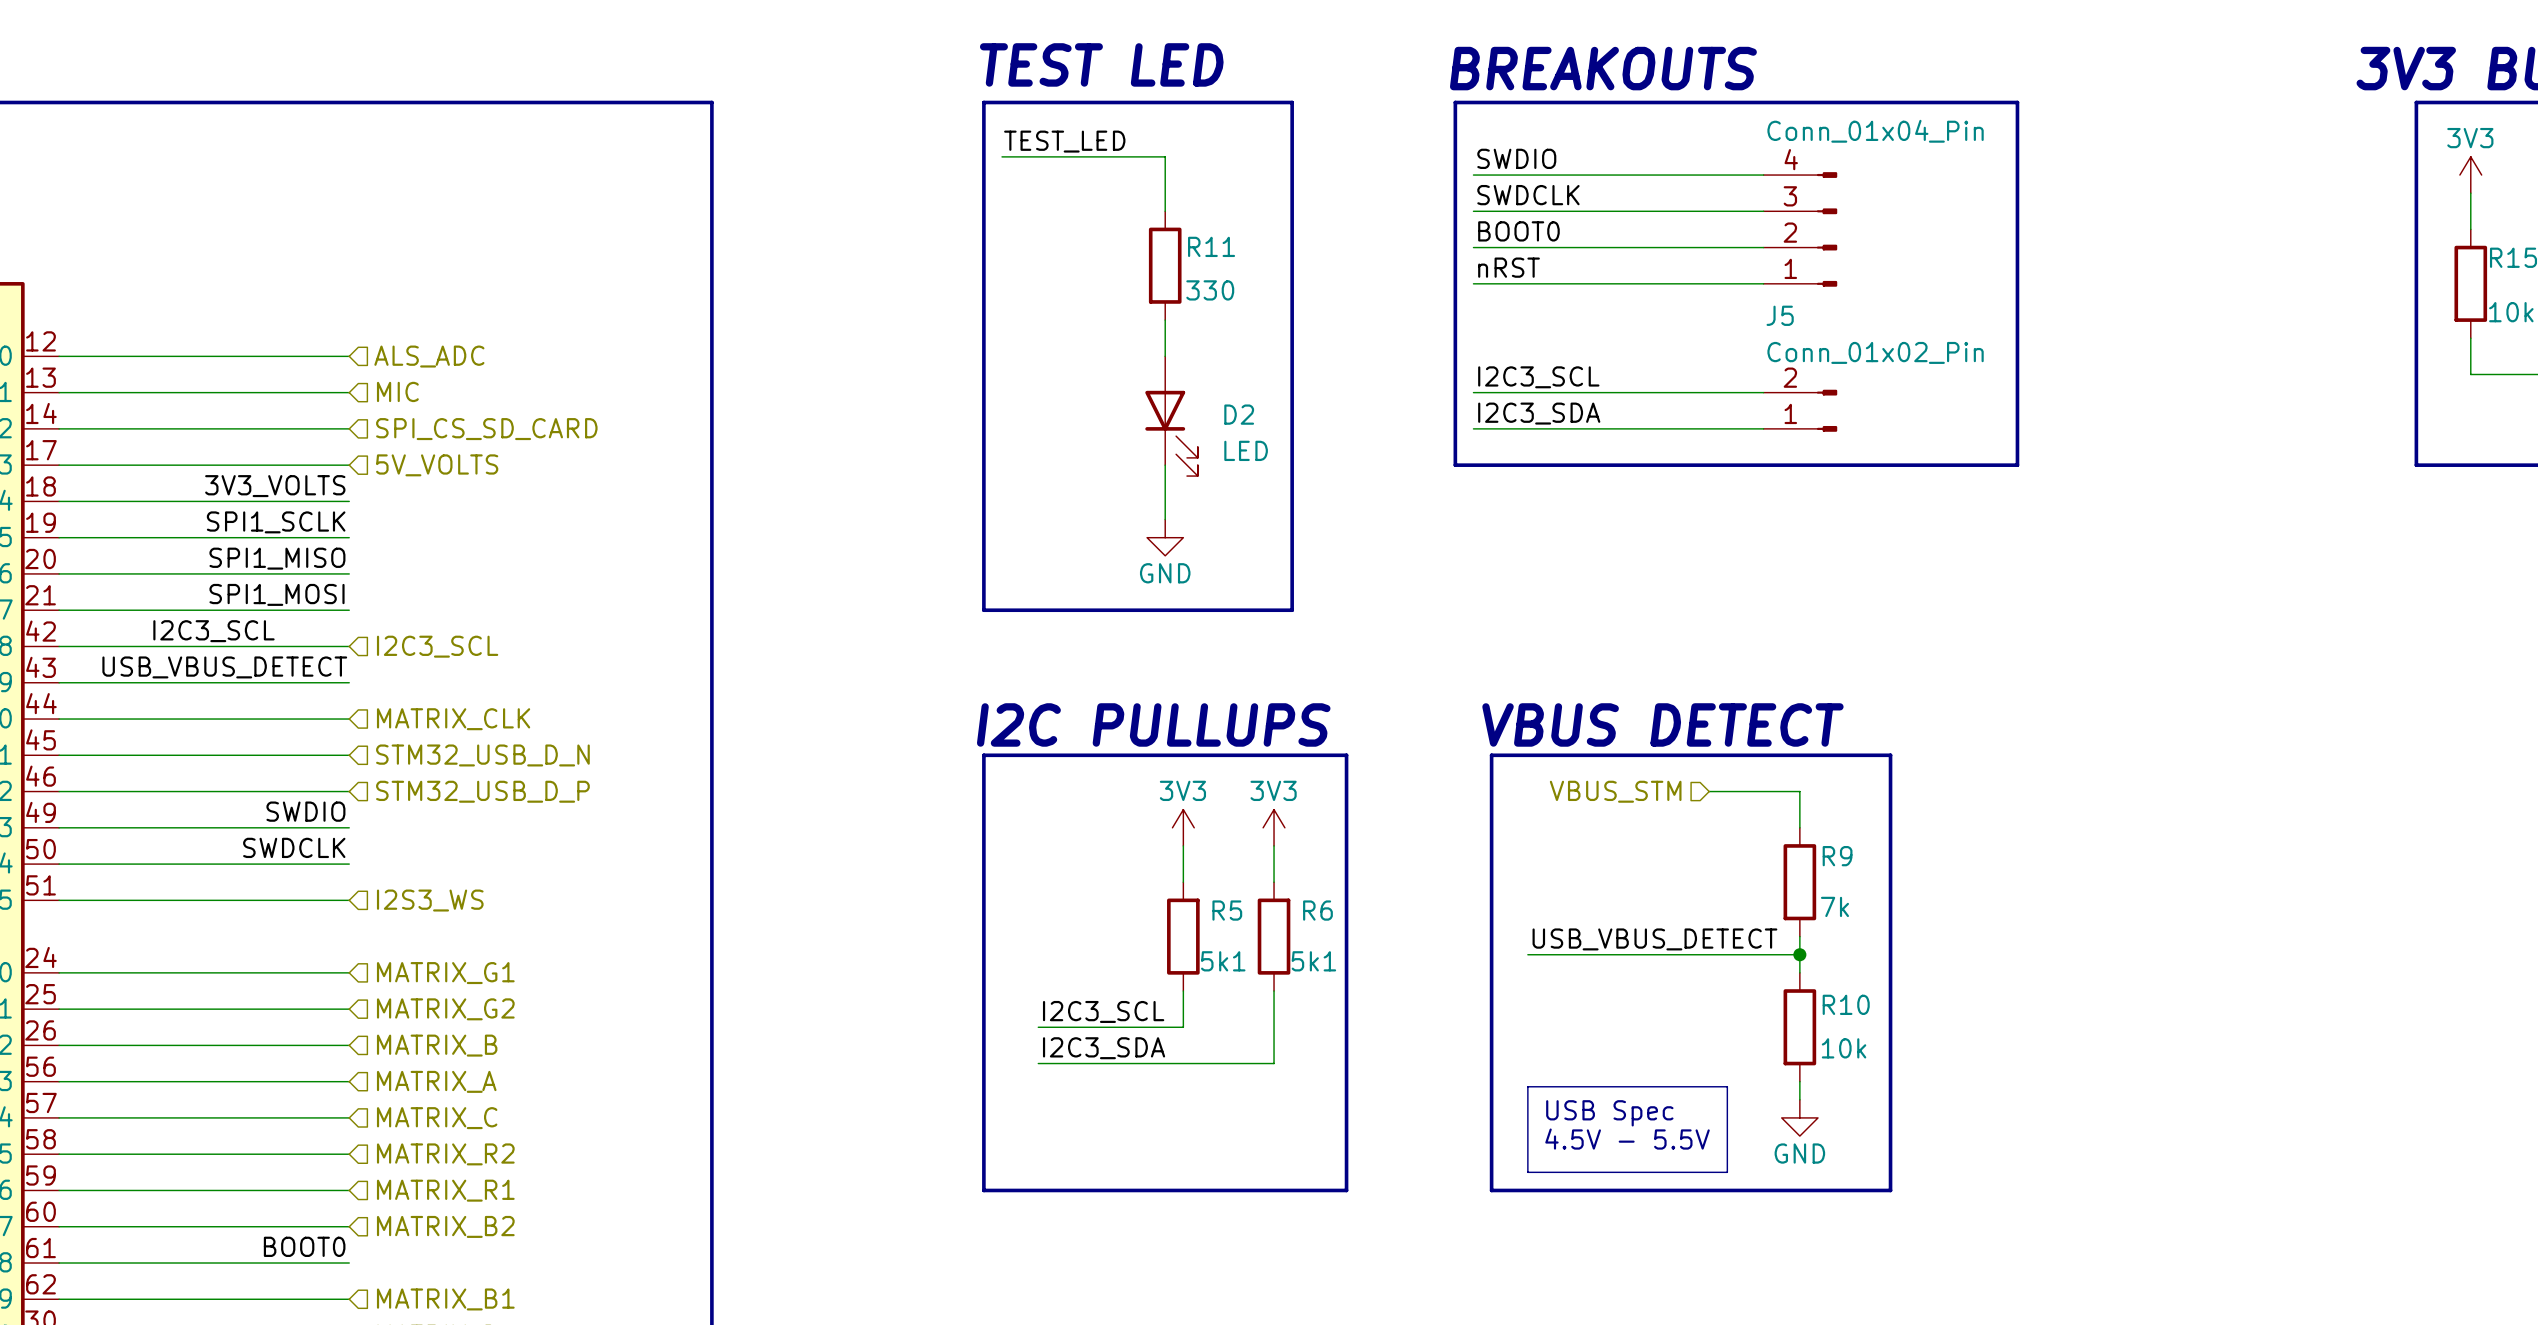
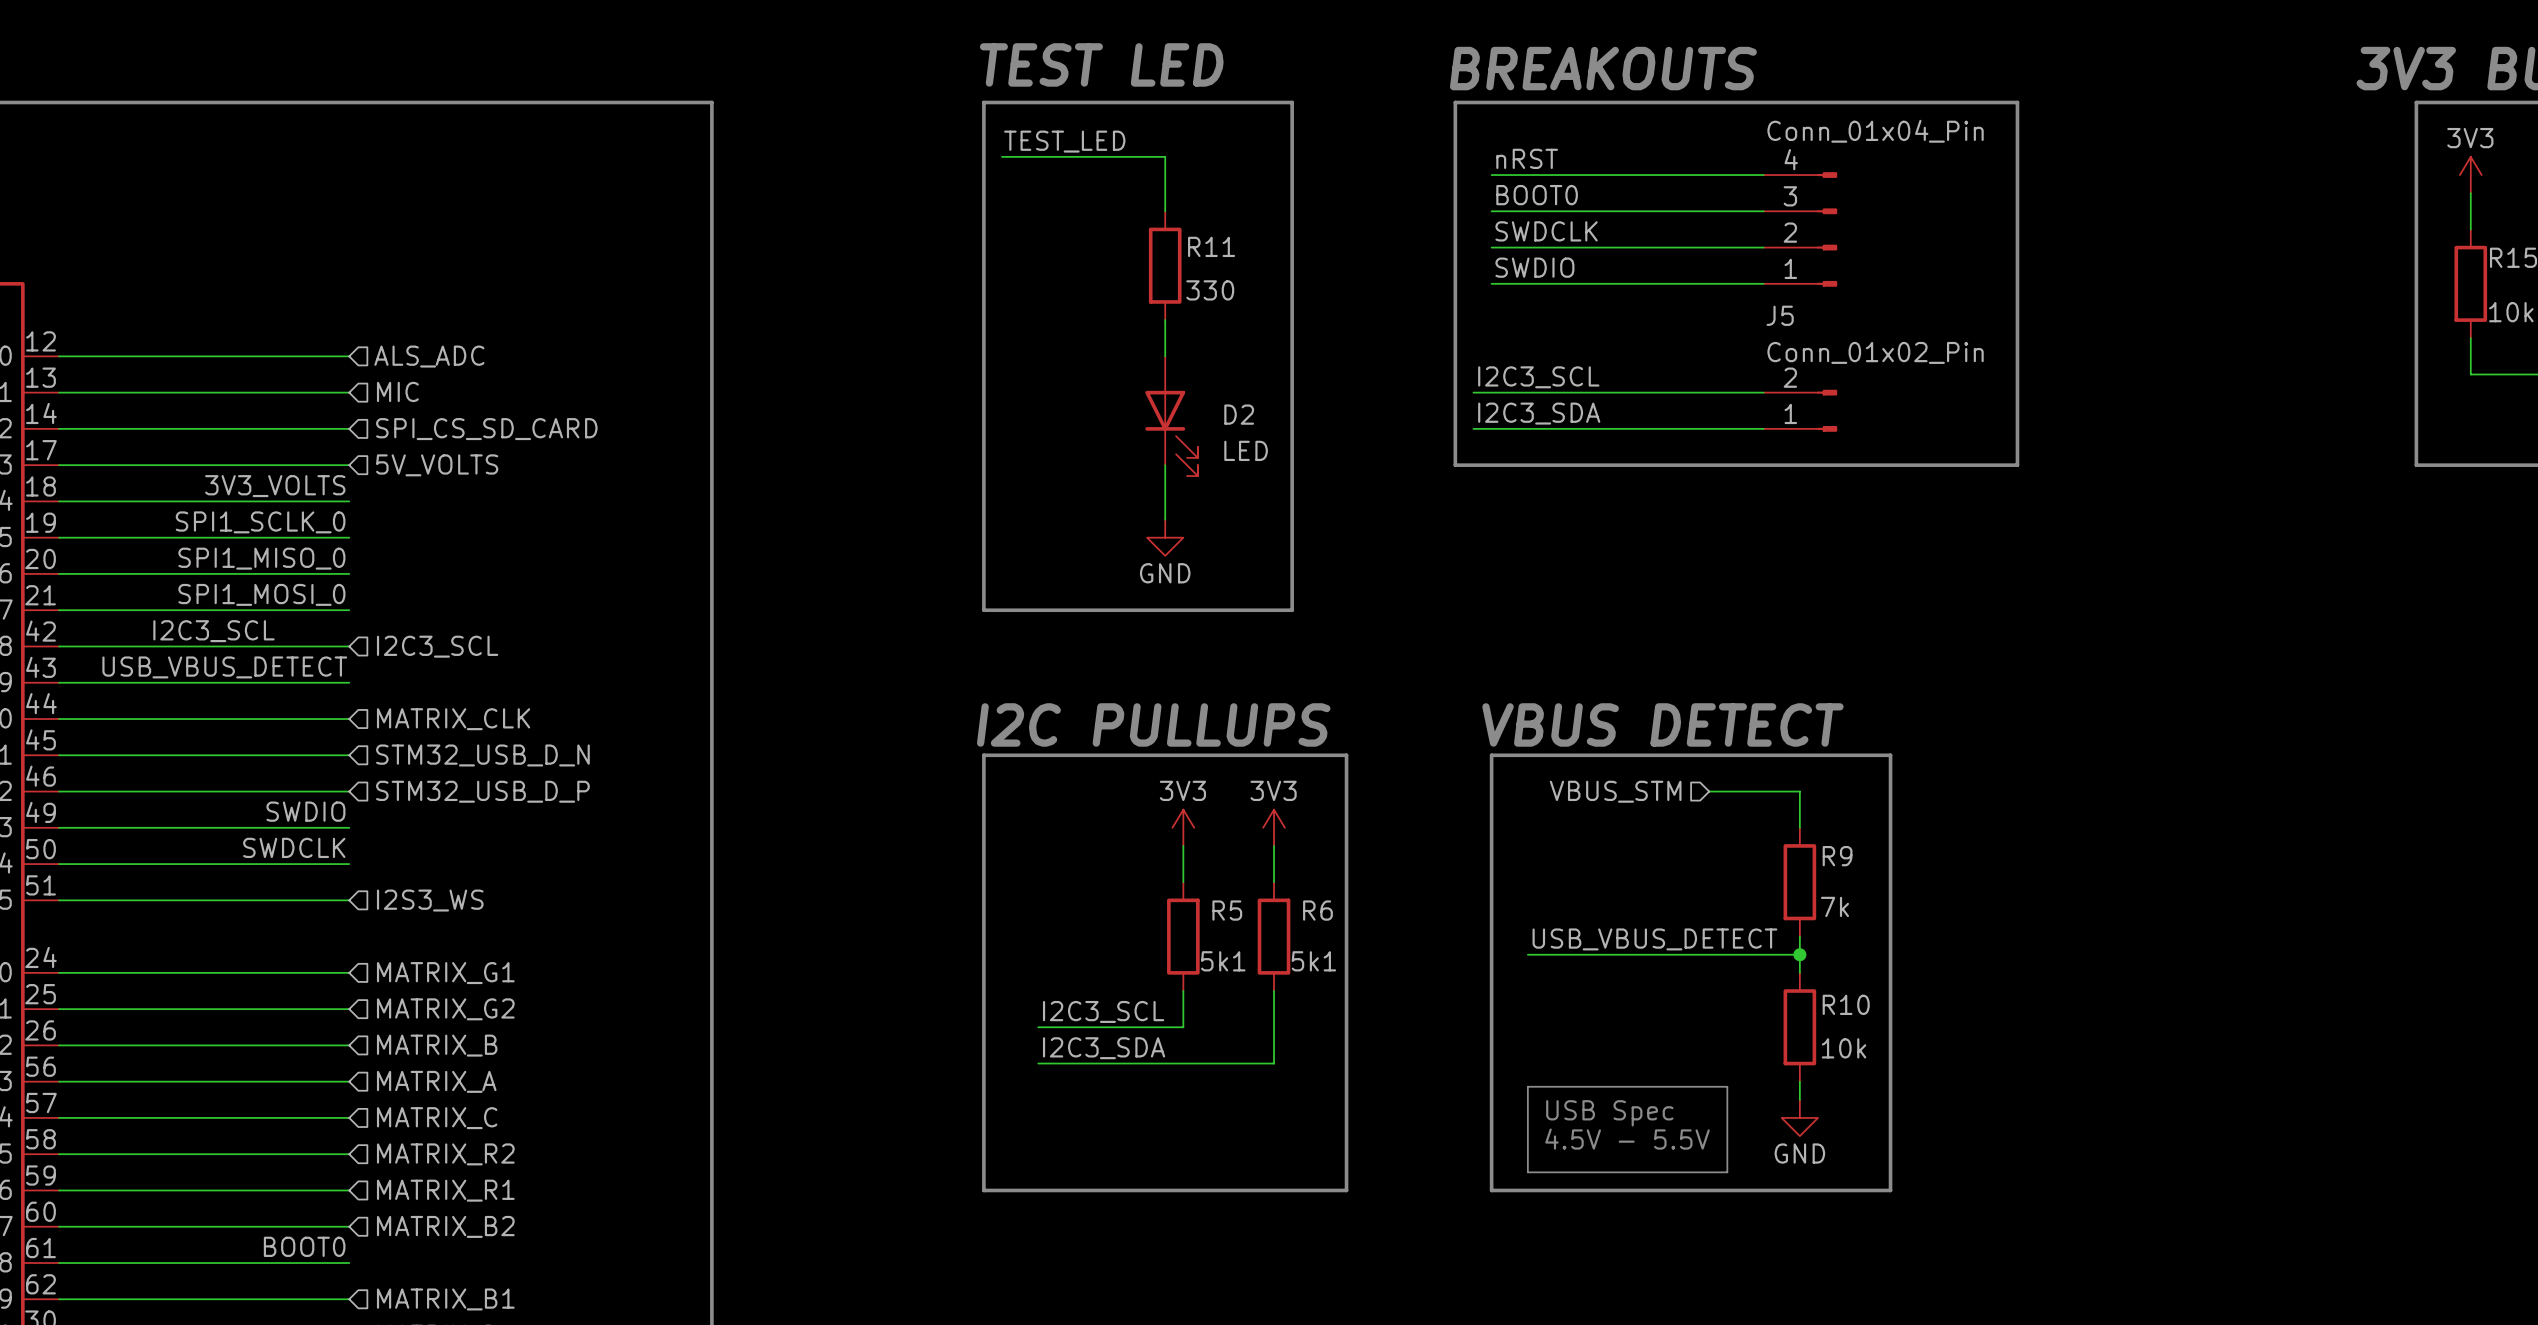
label position: SWDIO (1516, 158) -> SWDIO (1534, 267)
wire: (1473, 175) (1491, 175) -> none
label position: SWDCLK (1528, 195) -> SWDCLK (1546, 231)
wire: (1473, 211) (1491, 211) -> none
label position: BOOT0 (1518, 231) -> BOOT0 (1537, 195)
wire: (1473, 247) (1491, 247) -> none
label position: nRST (1509, 267) -> nRST (1527, 158)
wire: (1473, 283) (1491, 283) -> none
label: SPI1_SCLK (276, 522) -> SPI1_SCLK_0 (260, 522)
label: SPI1_MISO (277, 558) -> SPI1_MISO_0 (261, 558)
label: SPI1_MOSI (277, 594) -> SPI1_MOSI_0 (261, 594)

